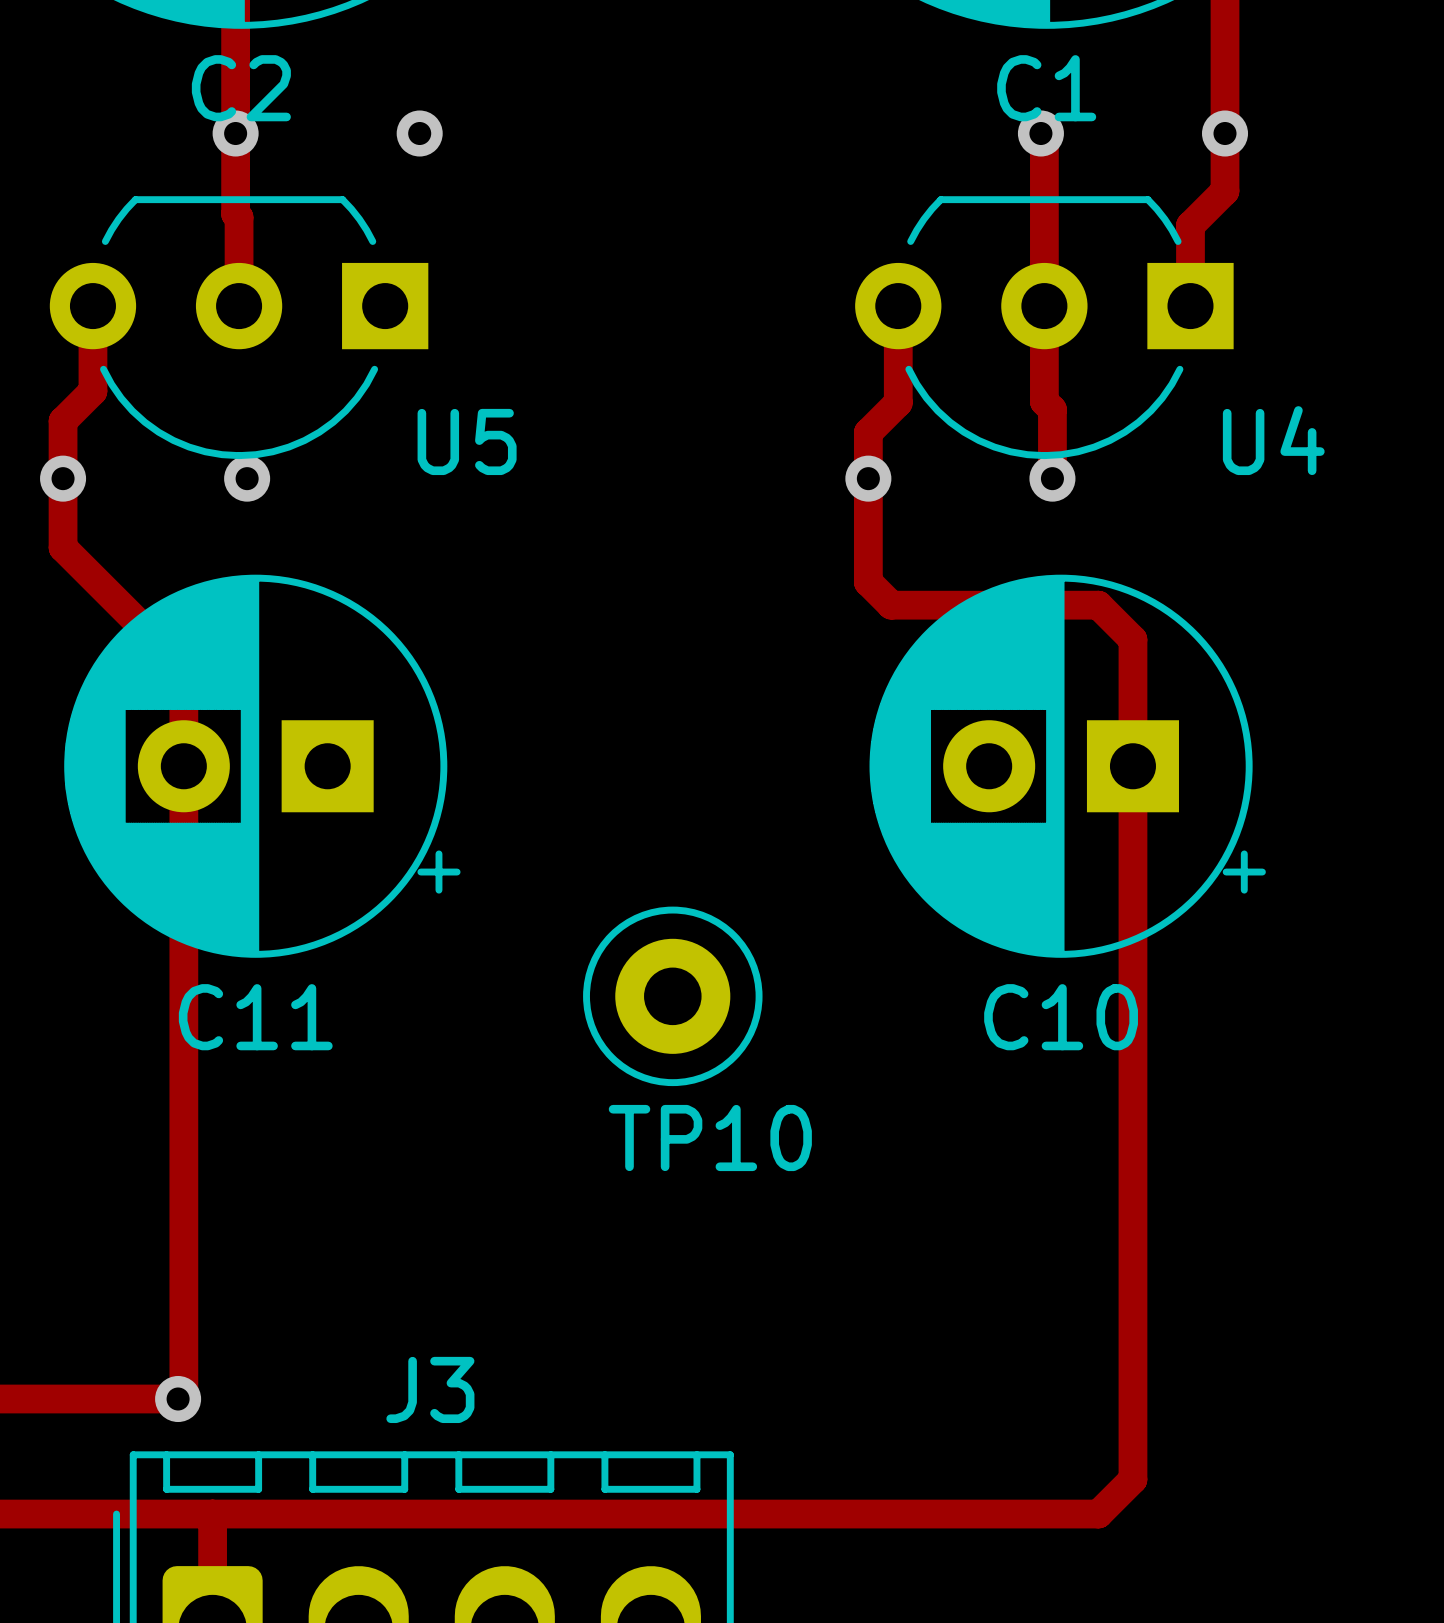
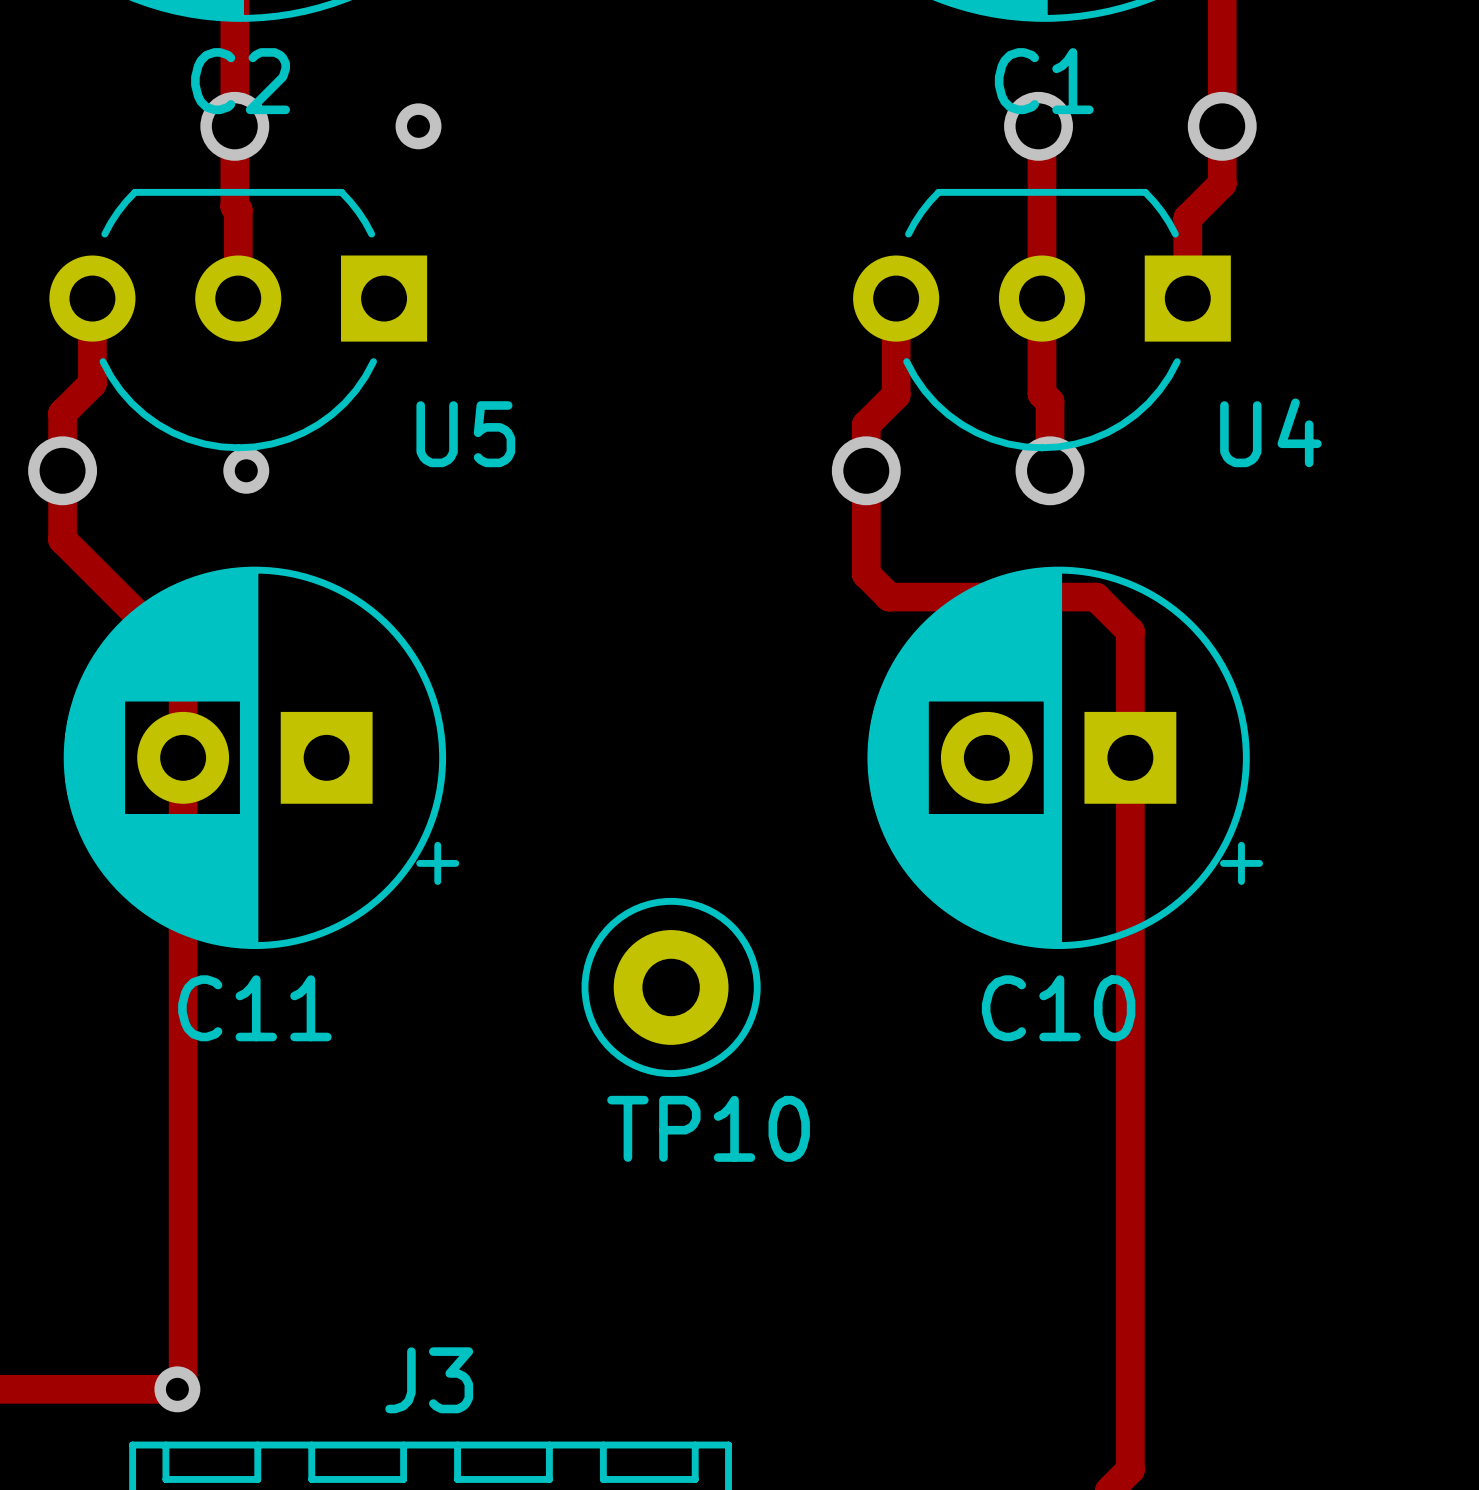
via size: [212, 110, 259, 157] -> [200, 91, 270, 161]
via size: [1017, 110, 1064, 157] -> [1004, 91, 1073, 161]
via size: [1202, 110, 1249, 157] -> [1187, 91, 1257, 161]
via size: [40, 455, 87, 502] -> [28, 436, 98, 506]
via size: [845, 455, 892, 502] -> [831, 436, 901, 506]
via size: [1029, 455, 1076, 502] -> [1015, 436, 1085, 506]

